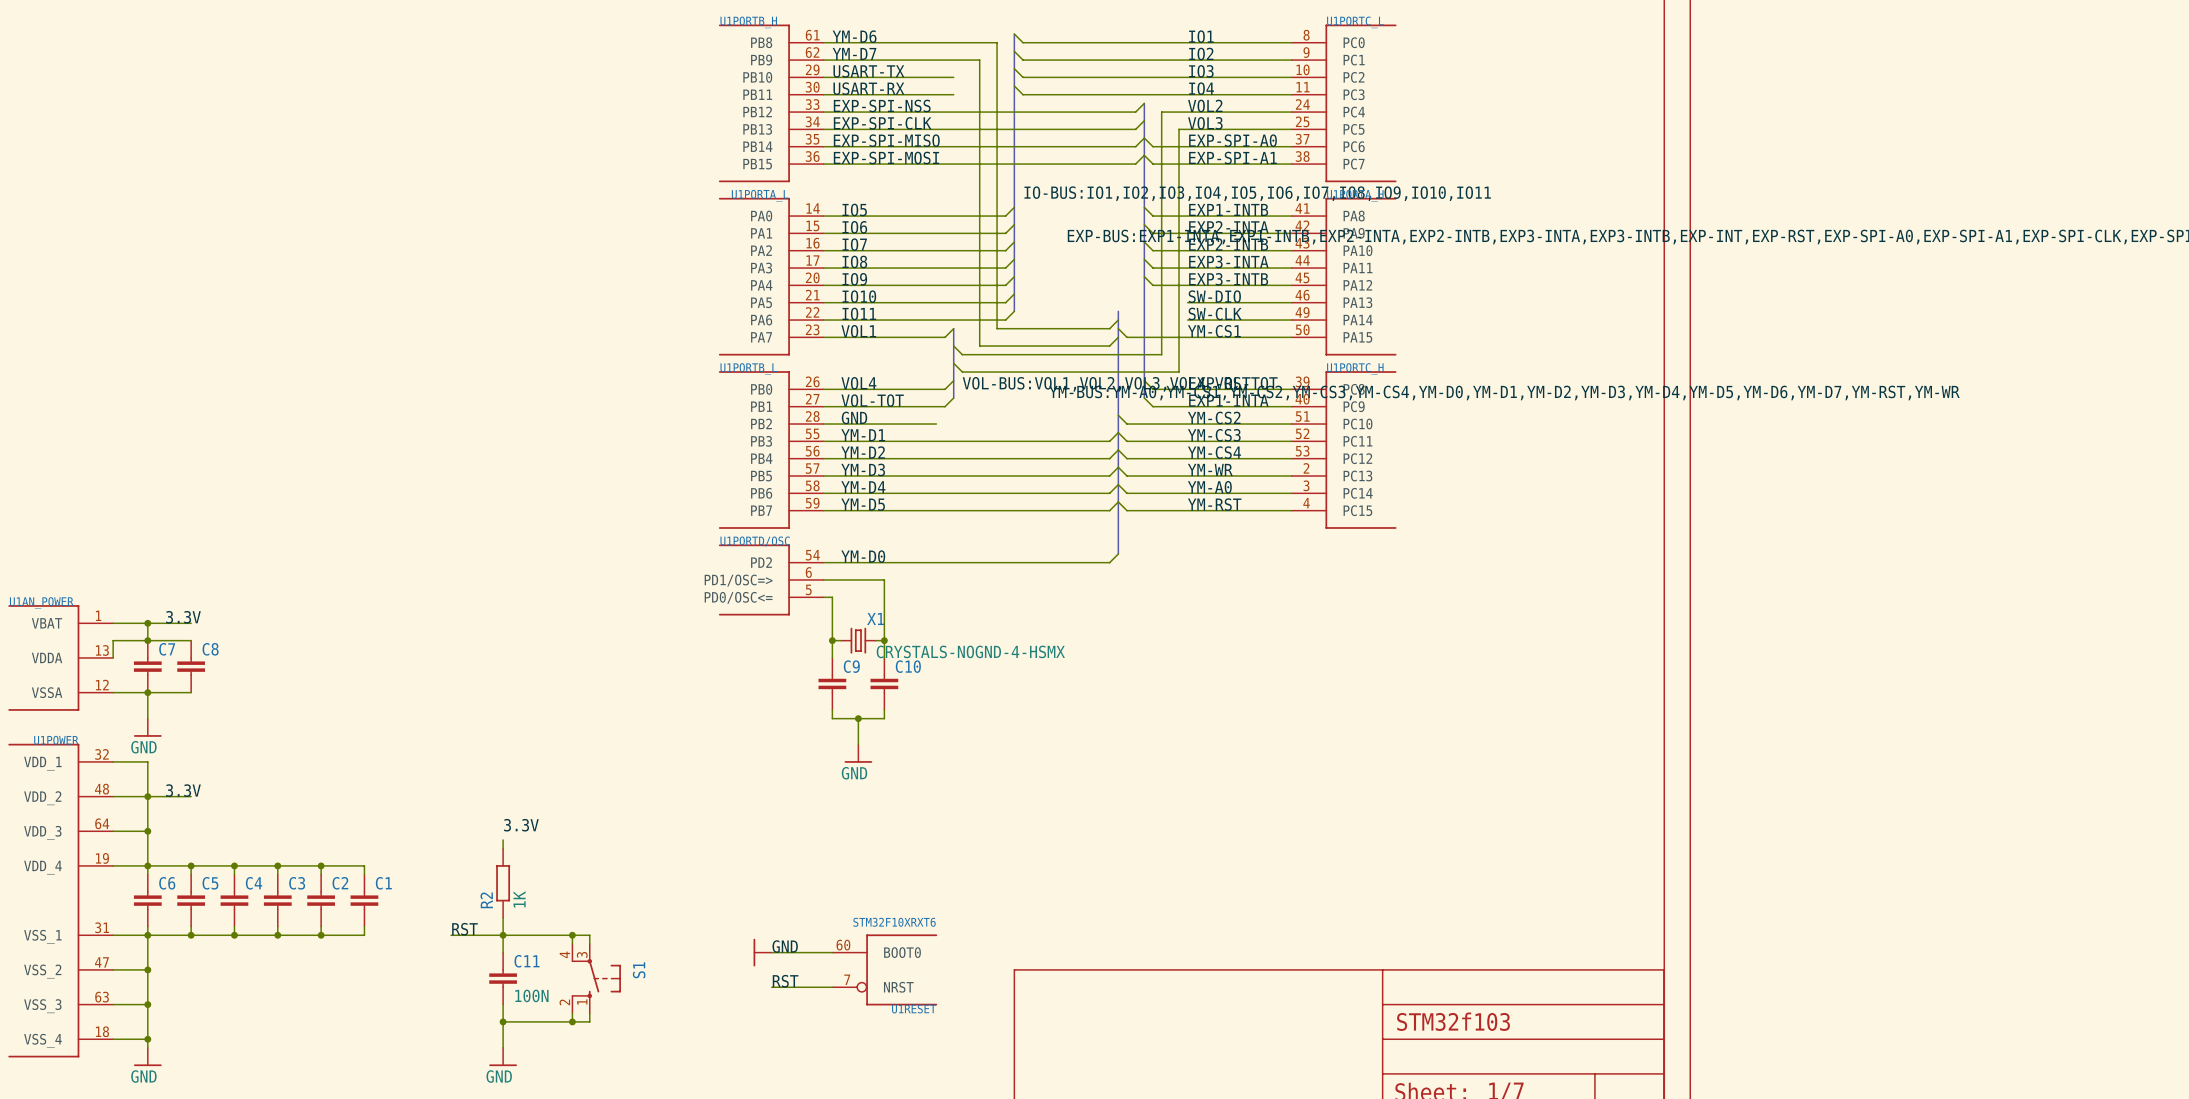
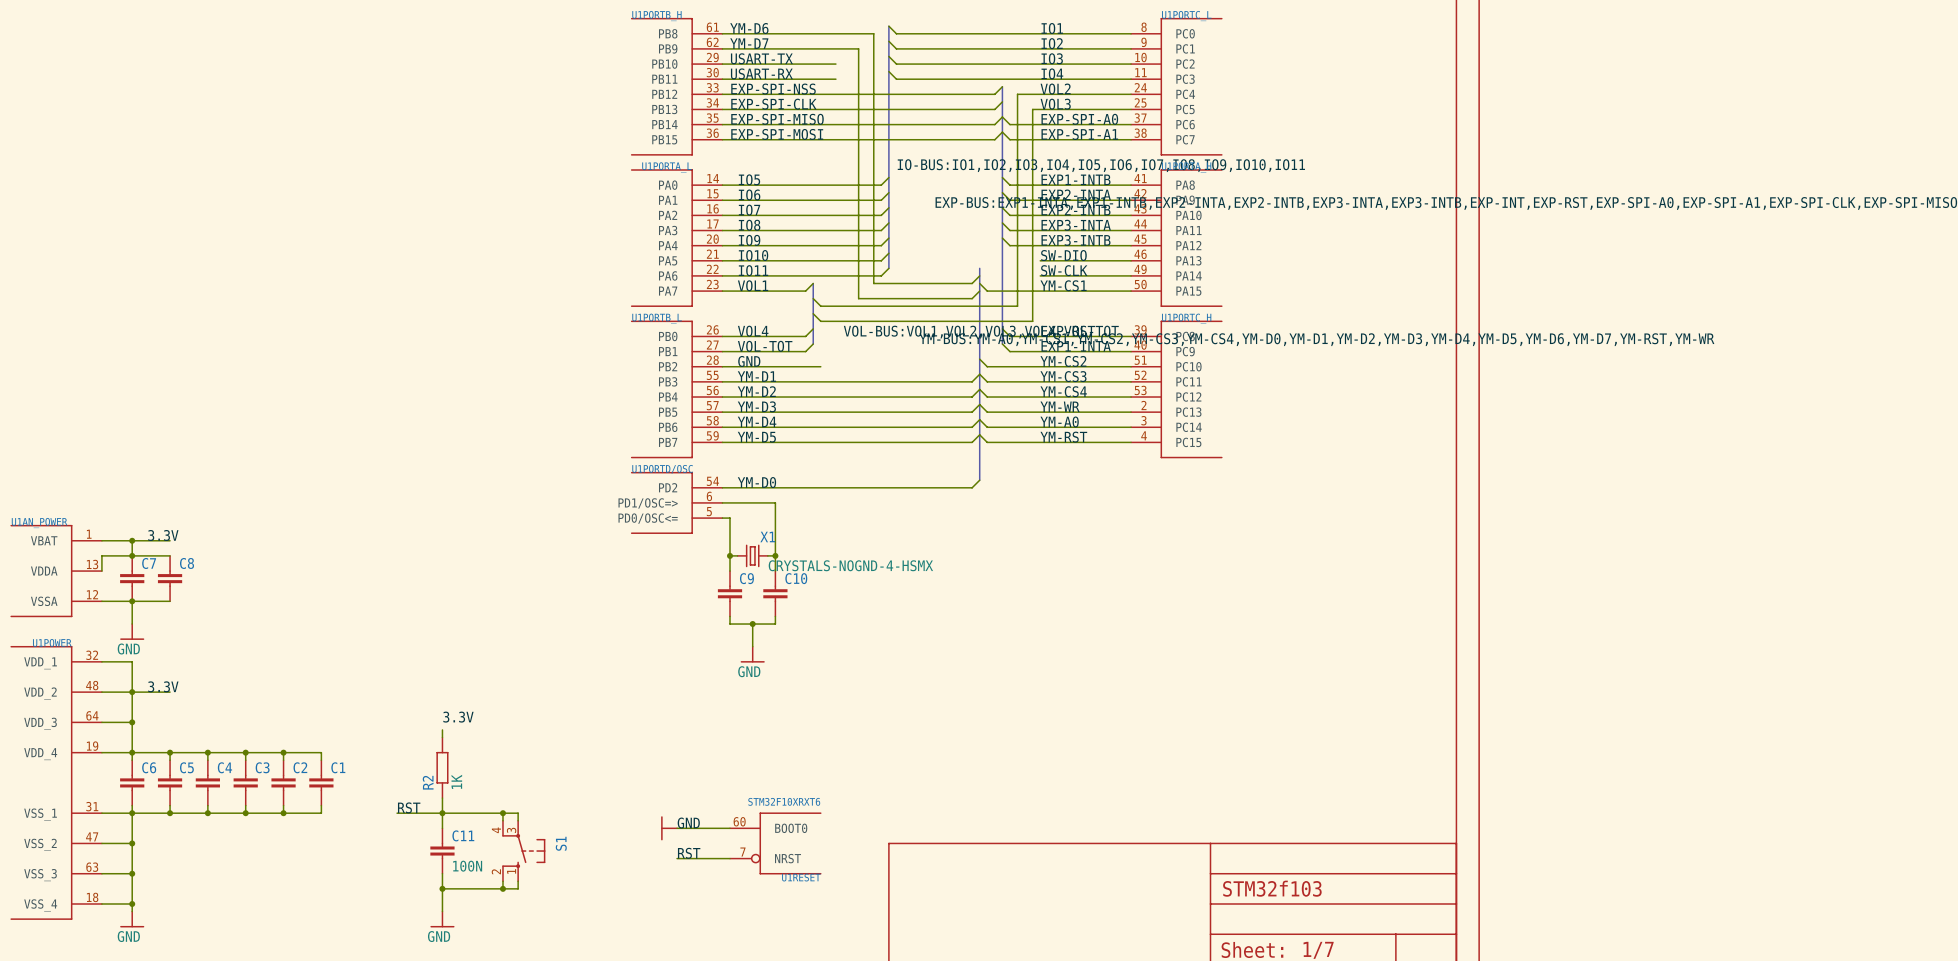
bus: (953, 328) (953, 398) -> (813, 283) (813, 344)
wire: (953, 328) (945, 337) (919, 337) -> (813, 283) (805, 291)
wire: (953, 346) (962, 354) -> (813, 298) (820, 306) (843, 306)
wire: (953, 363) (962, 372) -> (813, 313) (820, 321) (843, 321)
wire: (953, 380) (945, 389) (919, 389) -> (813, 328) (805, 336)
wire: (953, 398) (945, 406) (919, 406) -> (813, 344) (805, 351)

